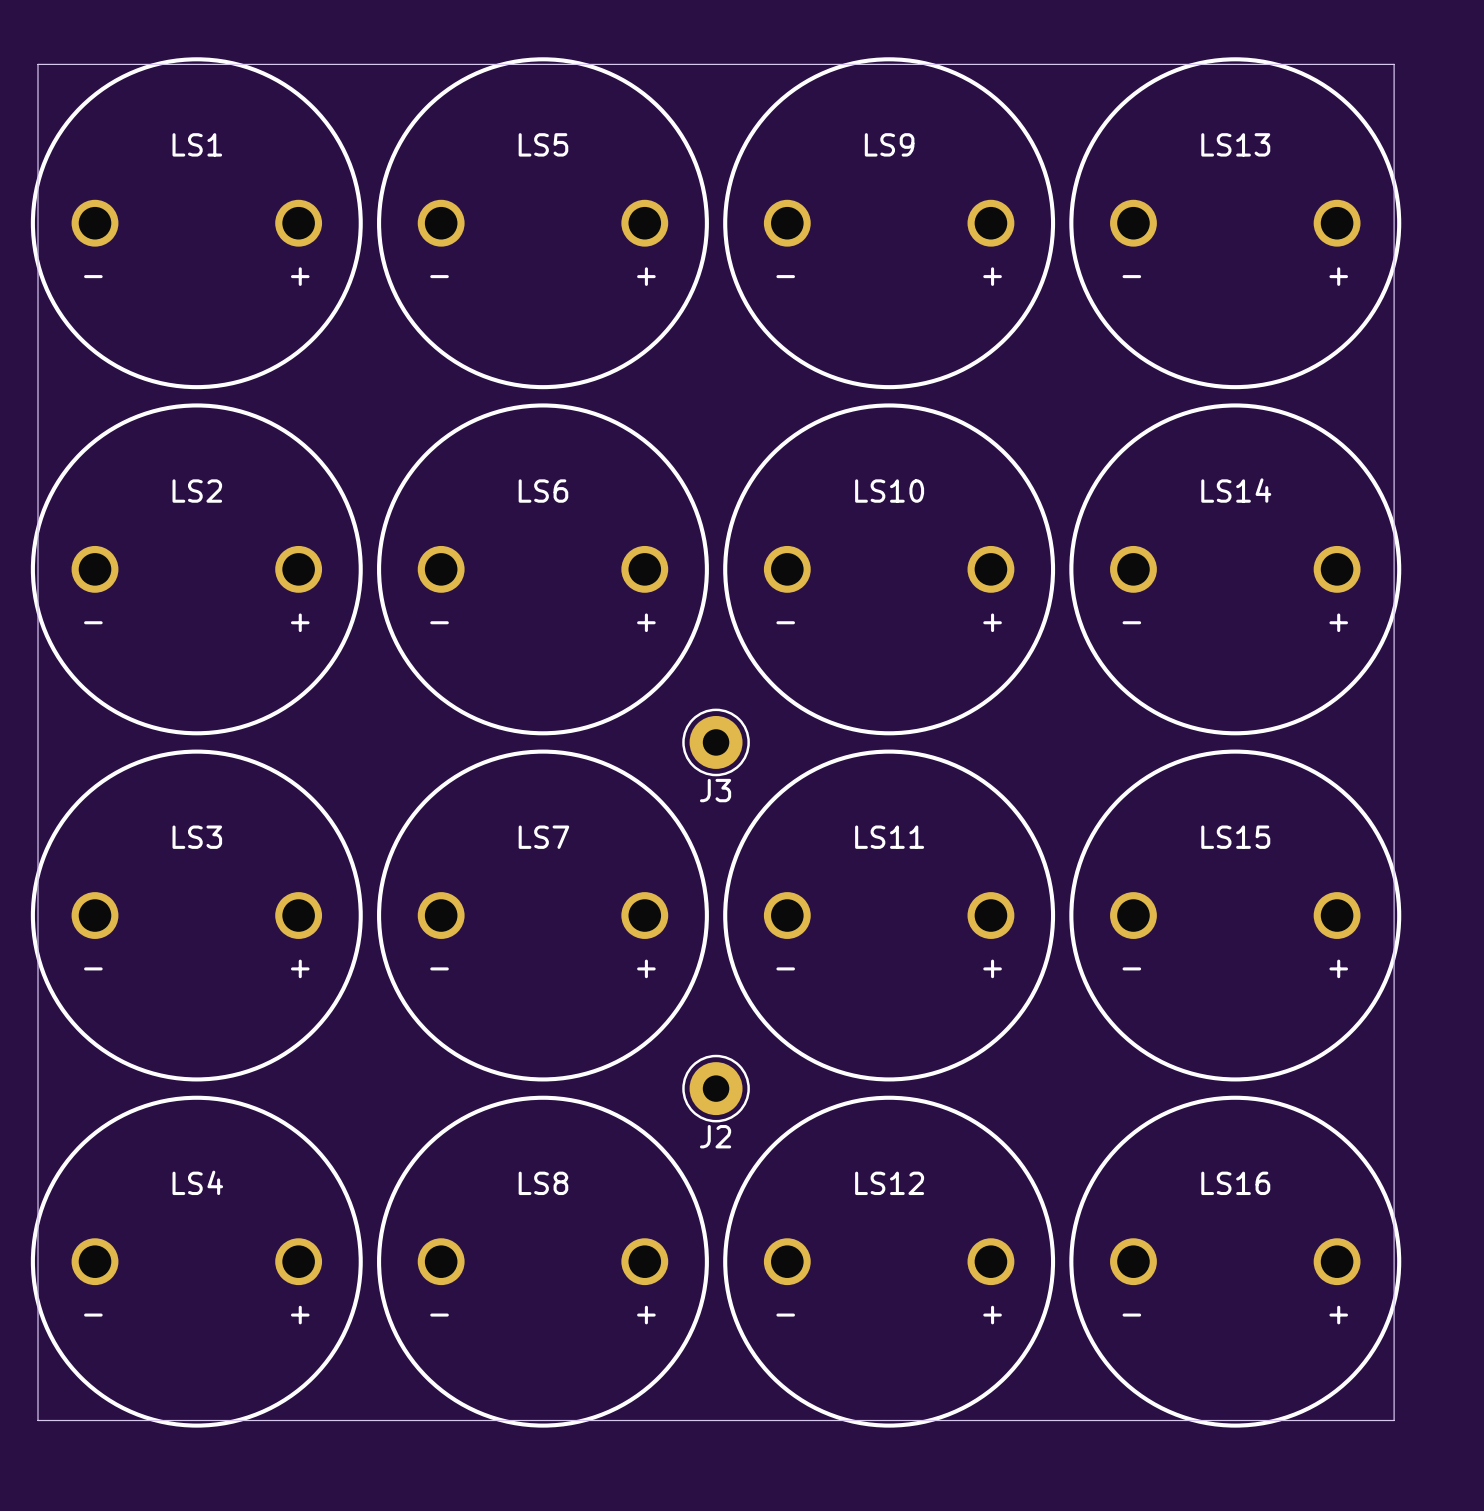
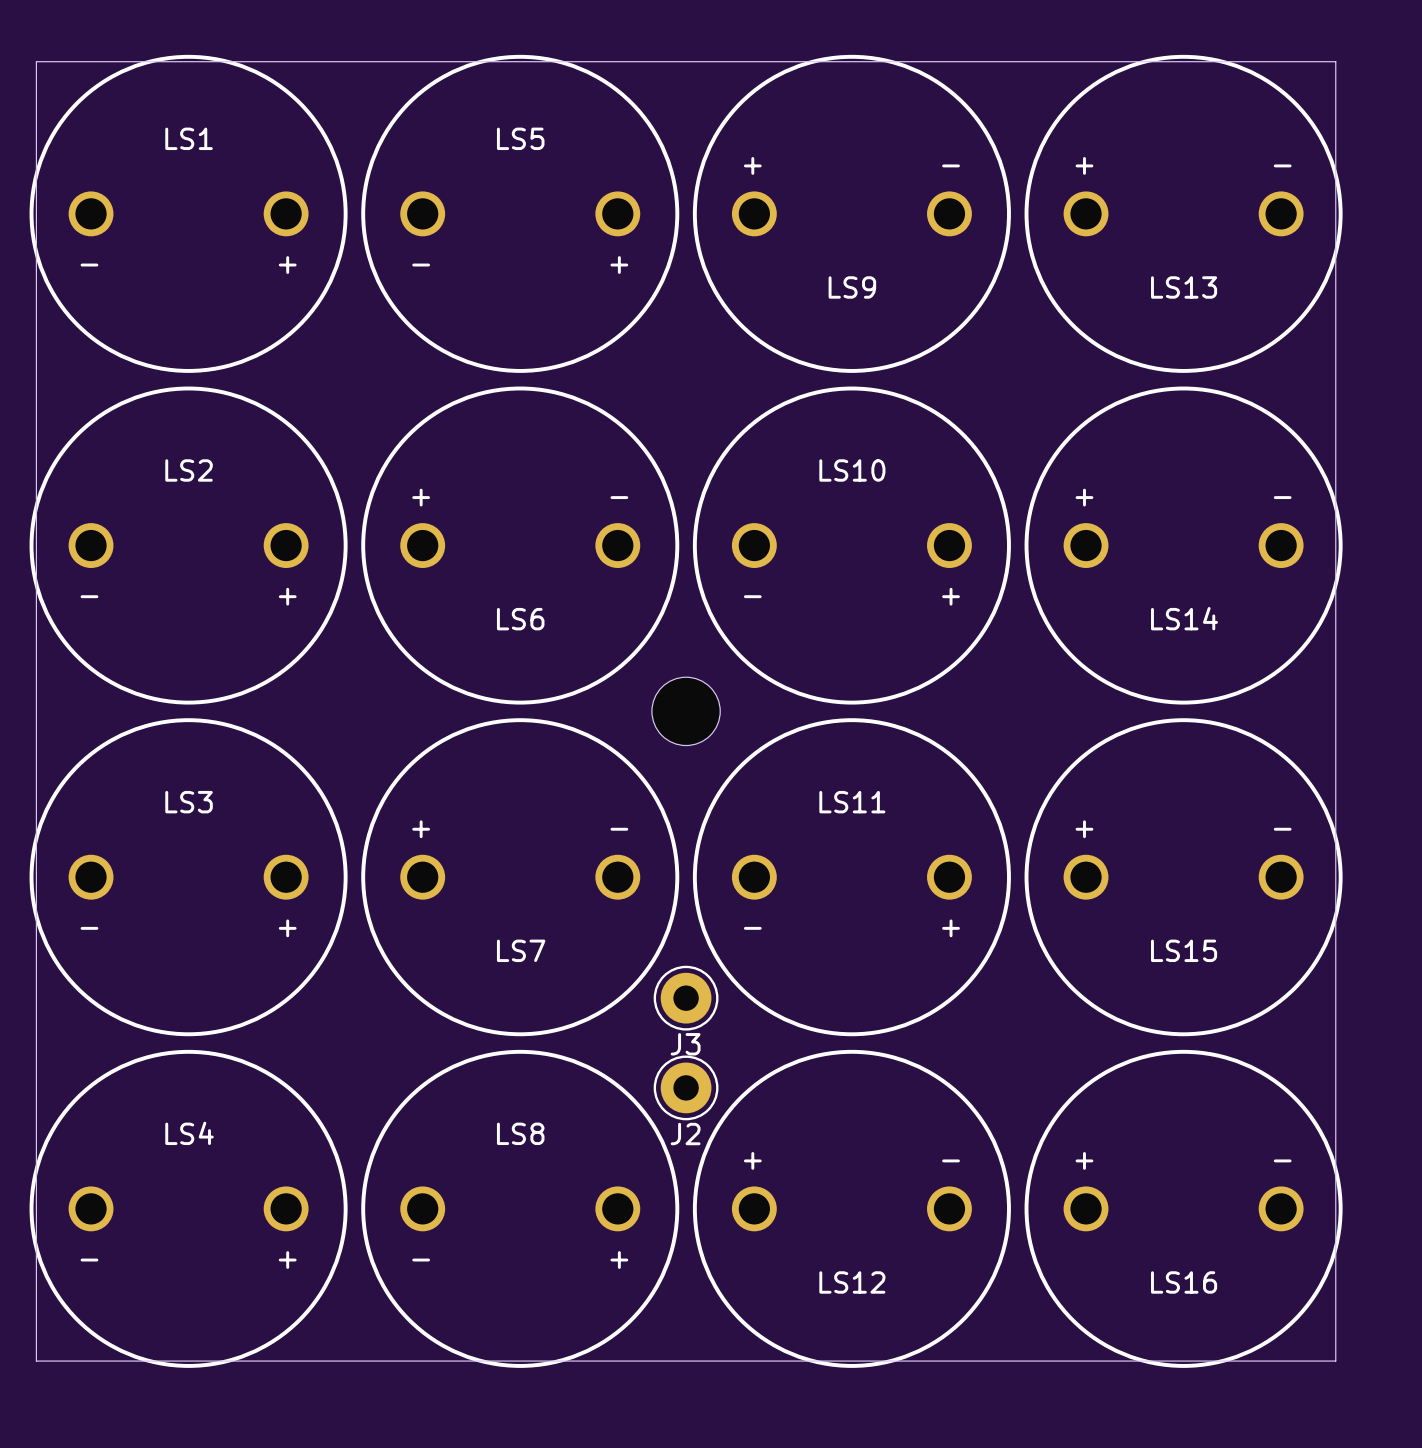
LS9 rotation: 0° (889, 223) -> 180° (851, 213)
LS13 rotation: 0° (1235, 223) -> 180° (1183, 213)
LS6 rotation: 0° (542, 569) -> 180° (520, 545)
LS14 rotation: 0° (1235, 569) -> 180° (1183, 545)
J3 position: (716, 742) -> (686, 998)
part: none -> (686, 711)
LS7 rotation: 0° (542, 915) -> 180° (520, 877)
LS15 rotation: 0° (1235, 915) -> 180° (1183, 877)
J2 position: (716, 1088) -> (686, 1087)
LS12 rotation: 0° (889, 1261) -> 180° (851, 1208)
LS16 rotation: 0° (1235, 1261) -> 180° (1183, 1208)

